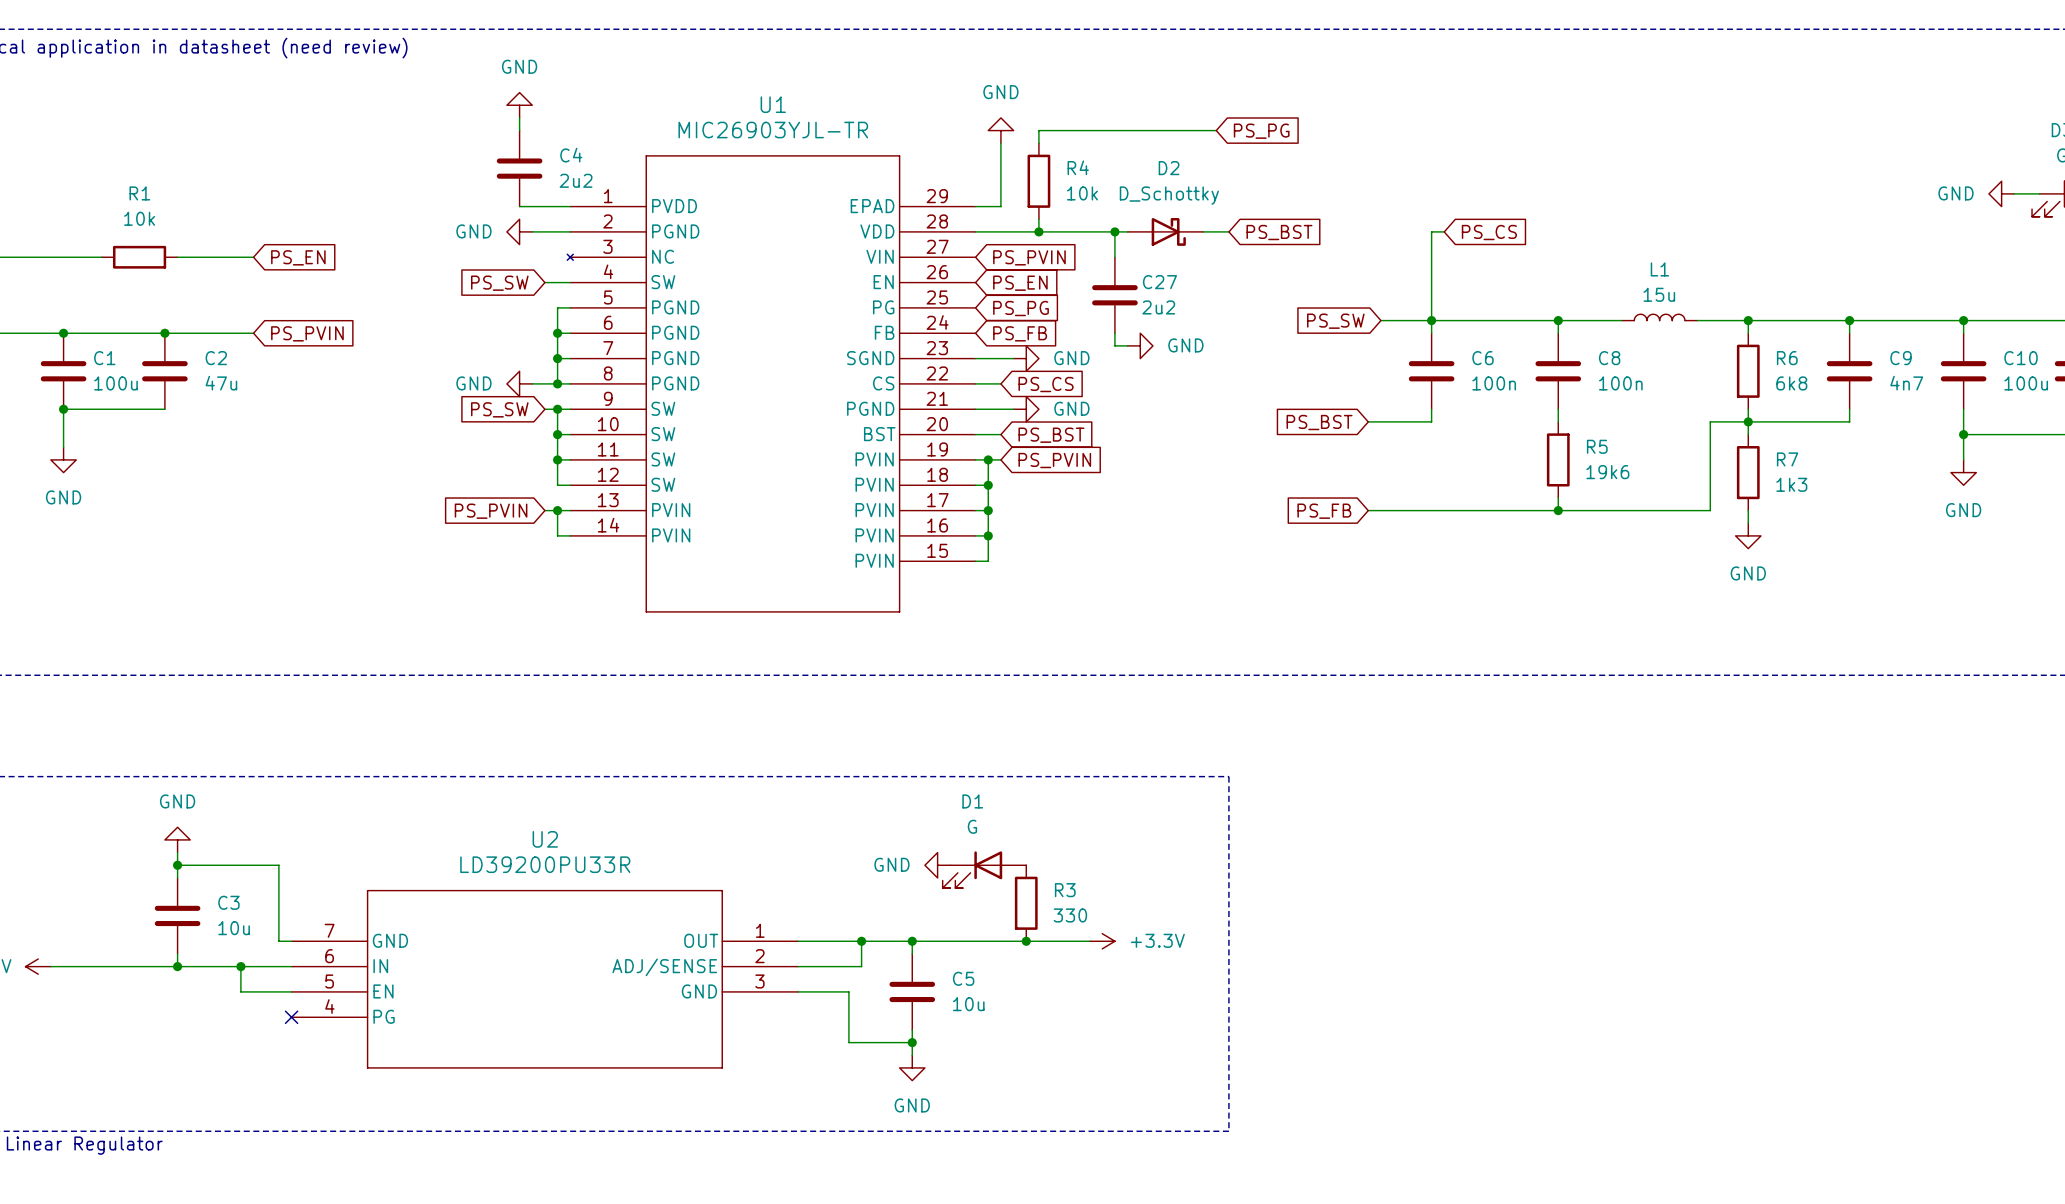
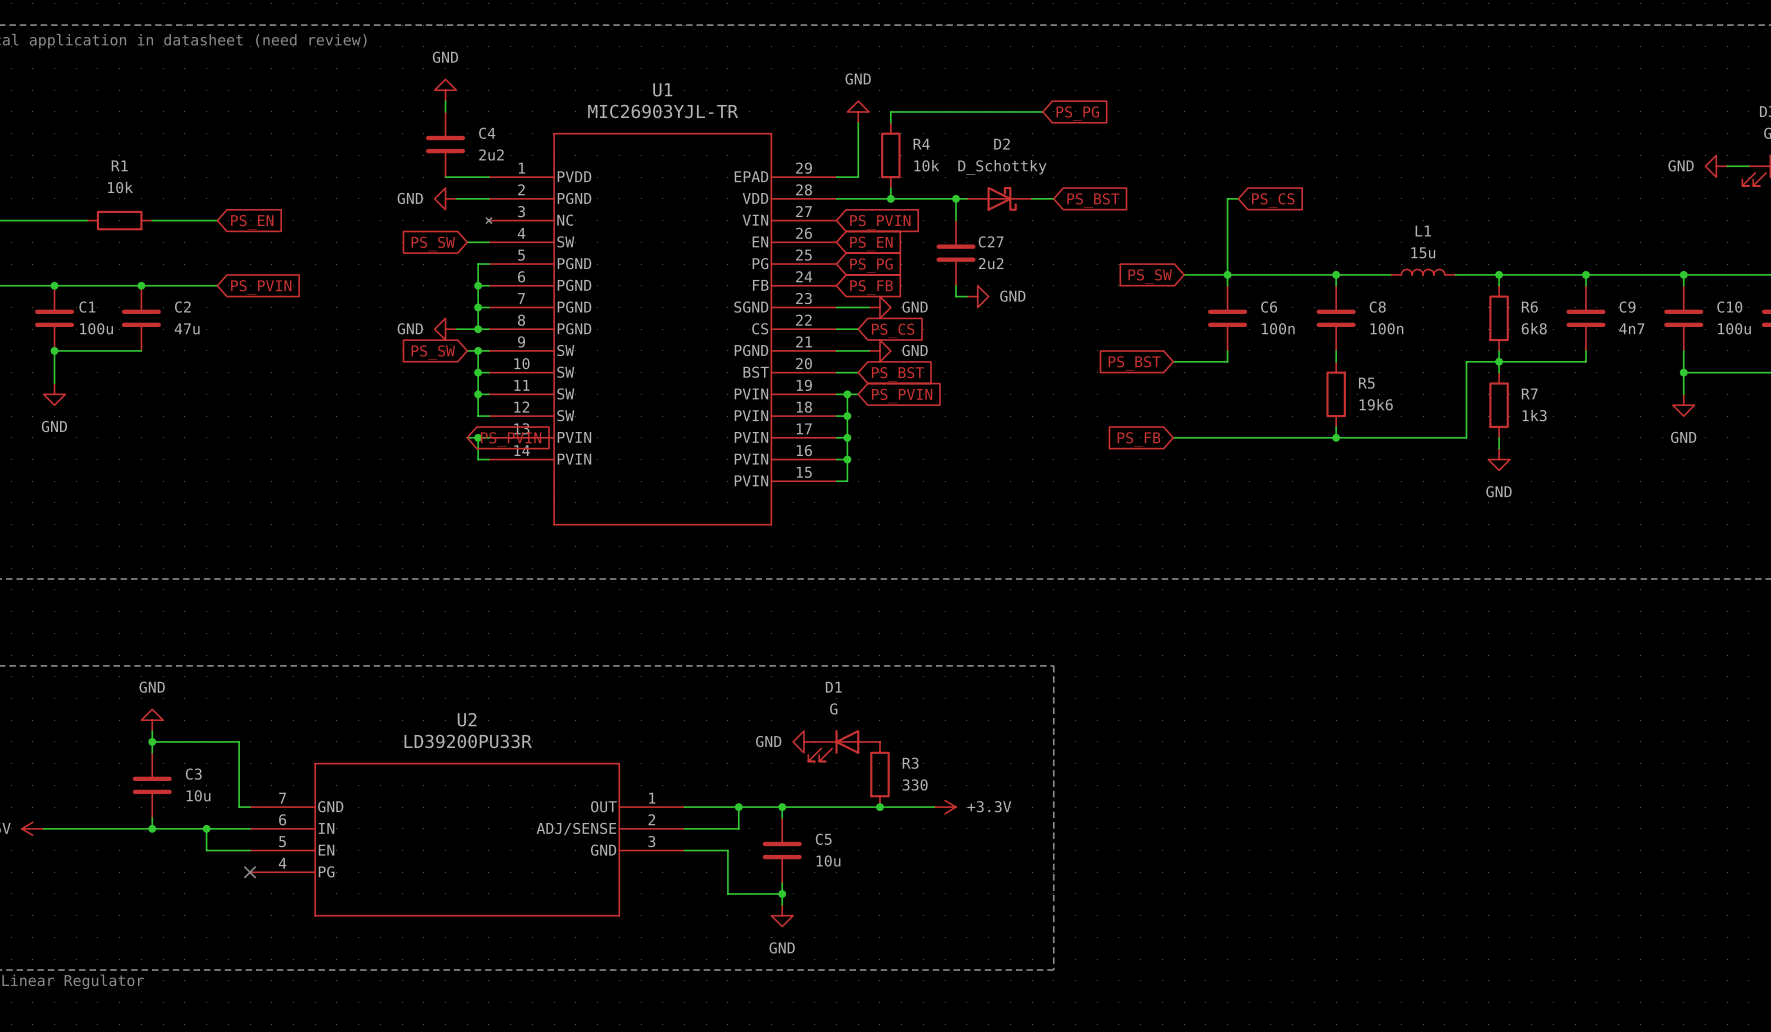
global label rotation: 0° (491, 511) -> 180° (511, 439)

